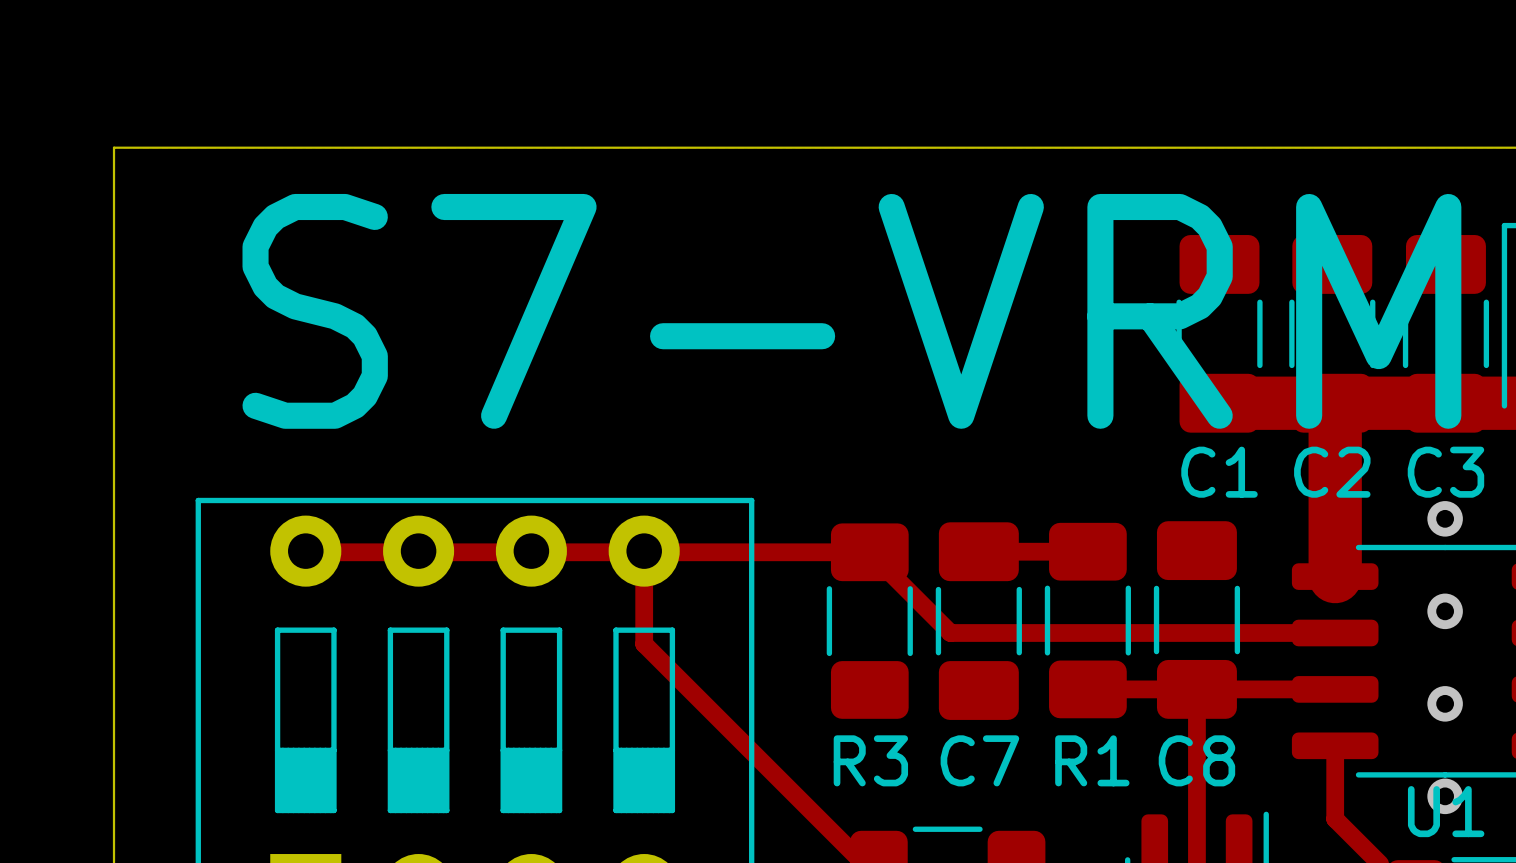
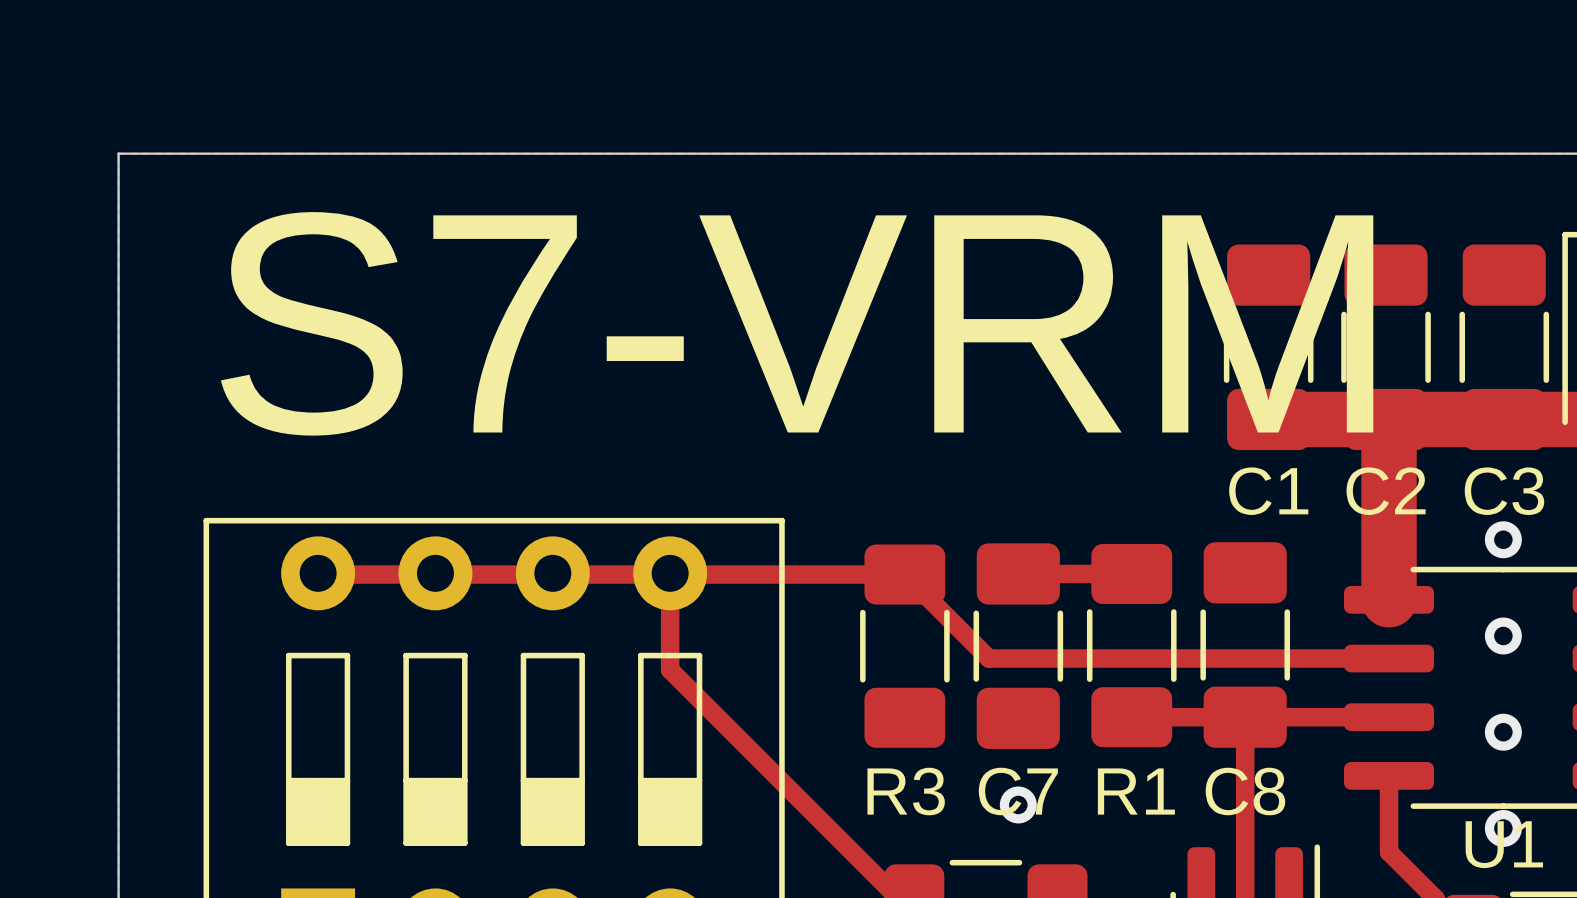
via: none -> (1018, 804)

